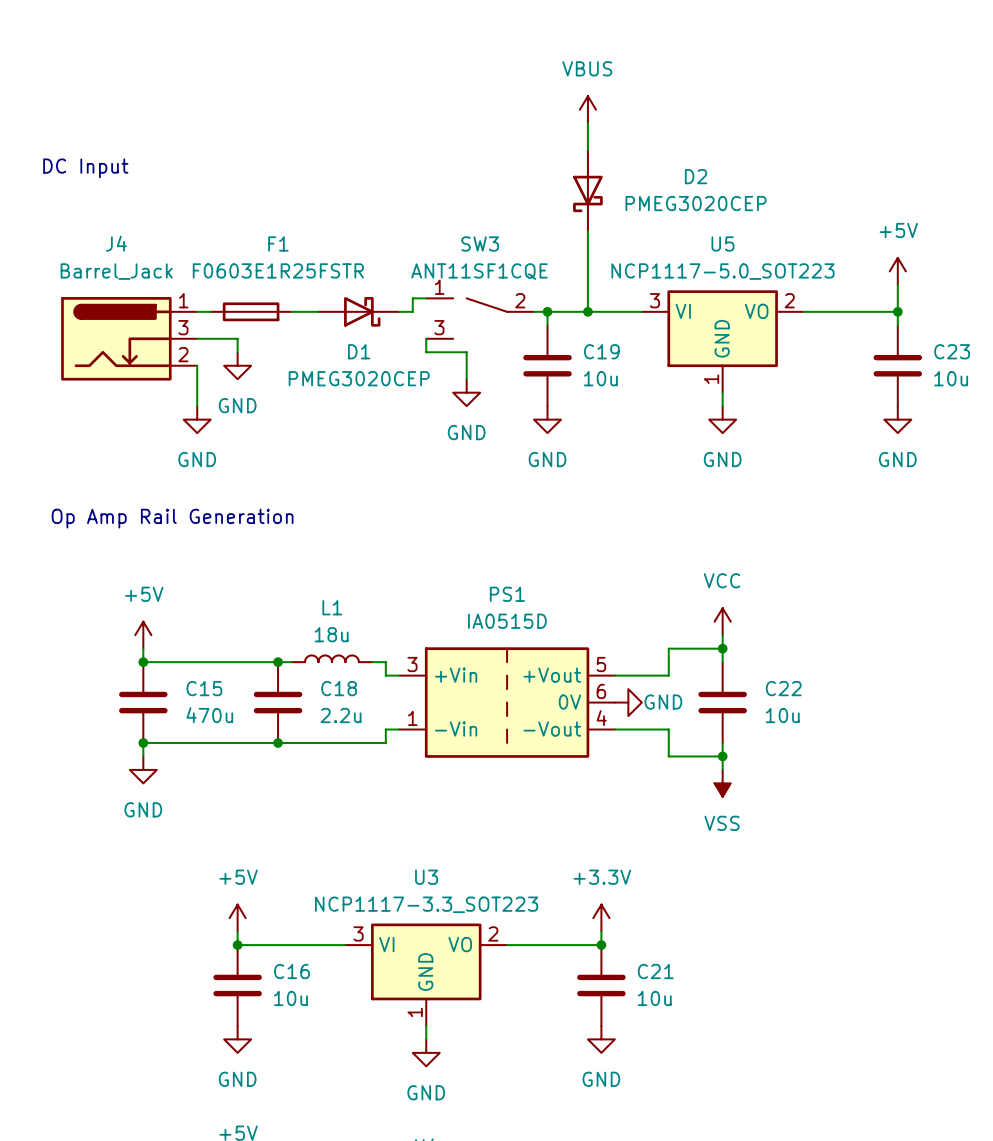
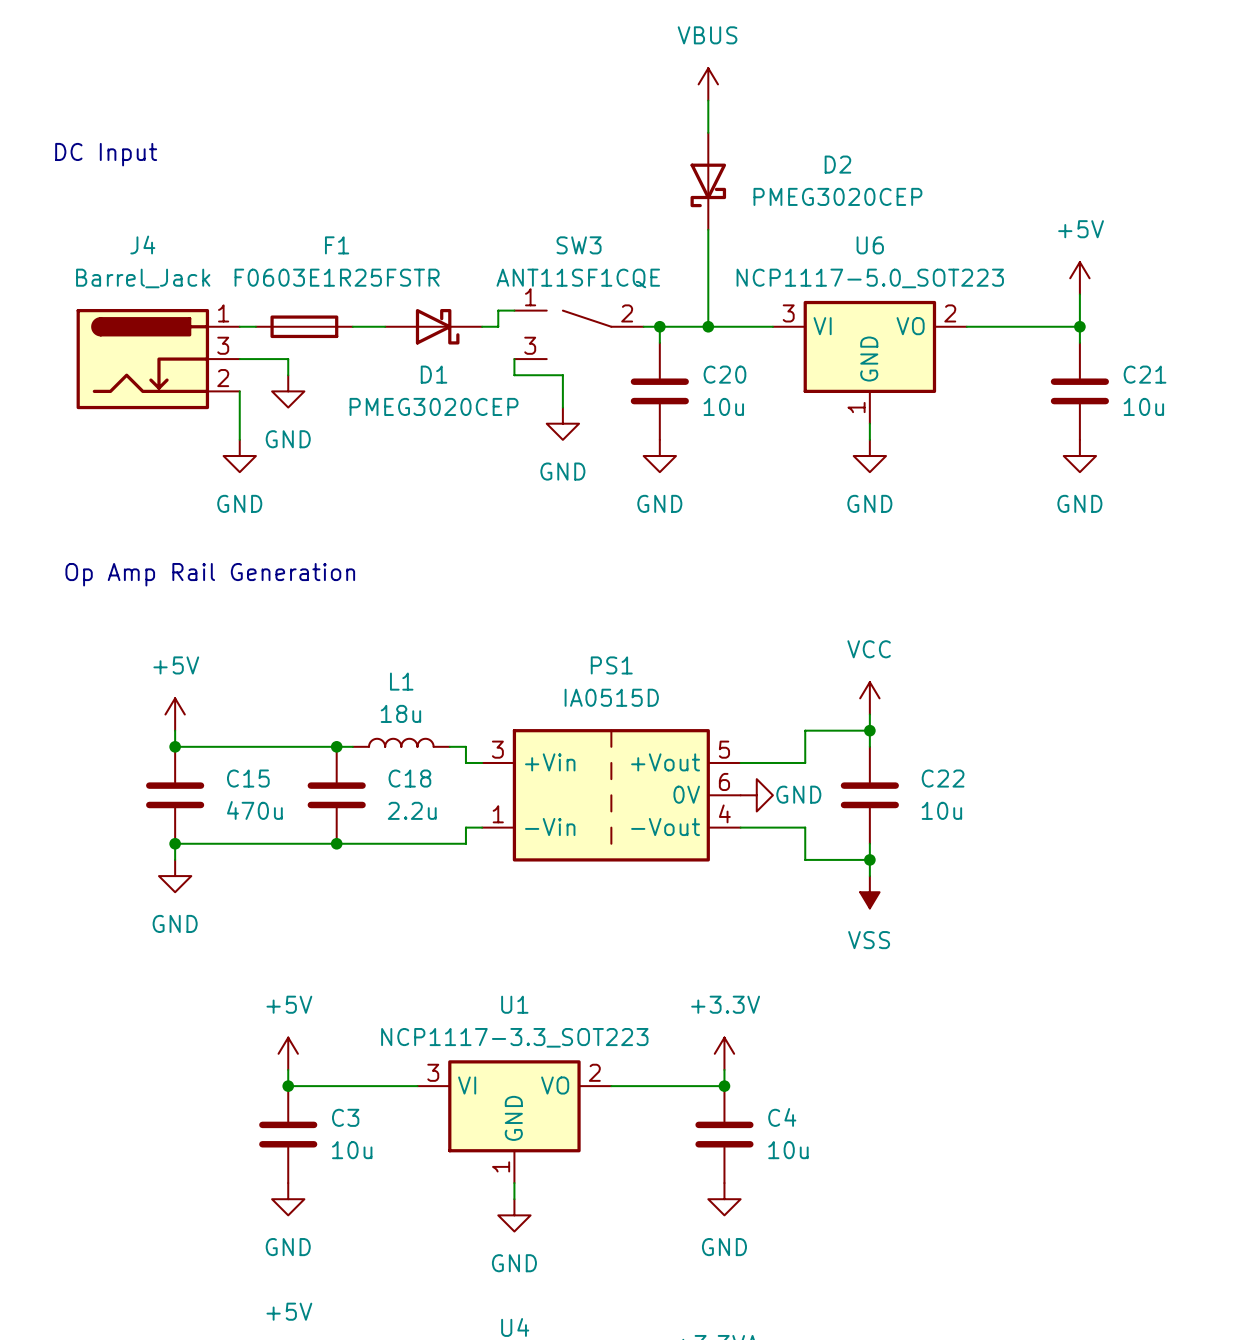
U5 name: U5 (722, 243) -> U6 (870, 245)
C19 name: C19 (601, 351) -> C20 (724, 374)
C23 name: C23 (952, 351) -> C21 (1145, 374)
U3 name: U3 (426, 877) -> U1 (514, 1004)
C16 name: C16 (291, 971) -> C3 (345, 1117)
C21 name: C21 (655, 971) -> C4 (782, 1117)

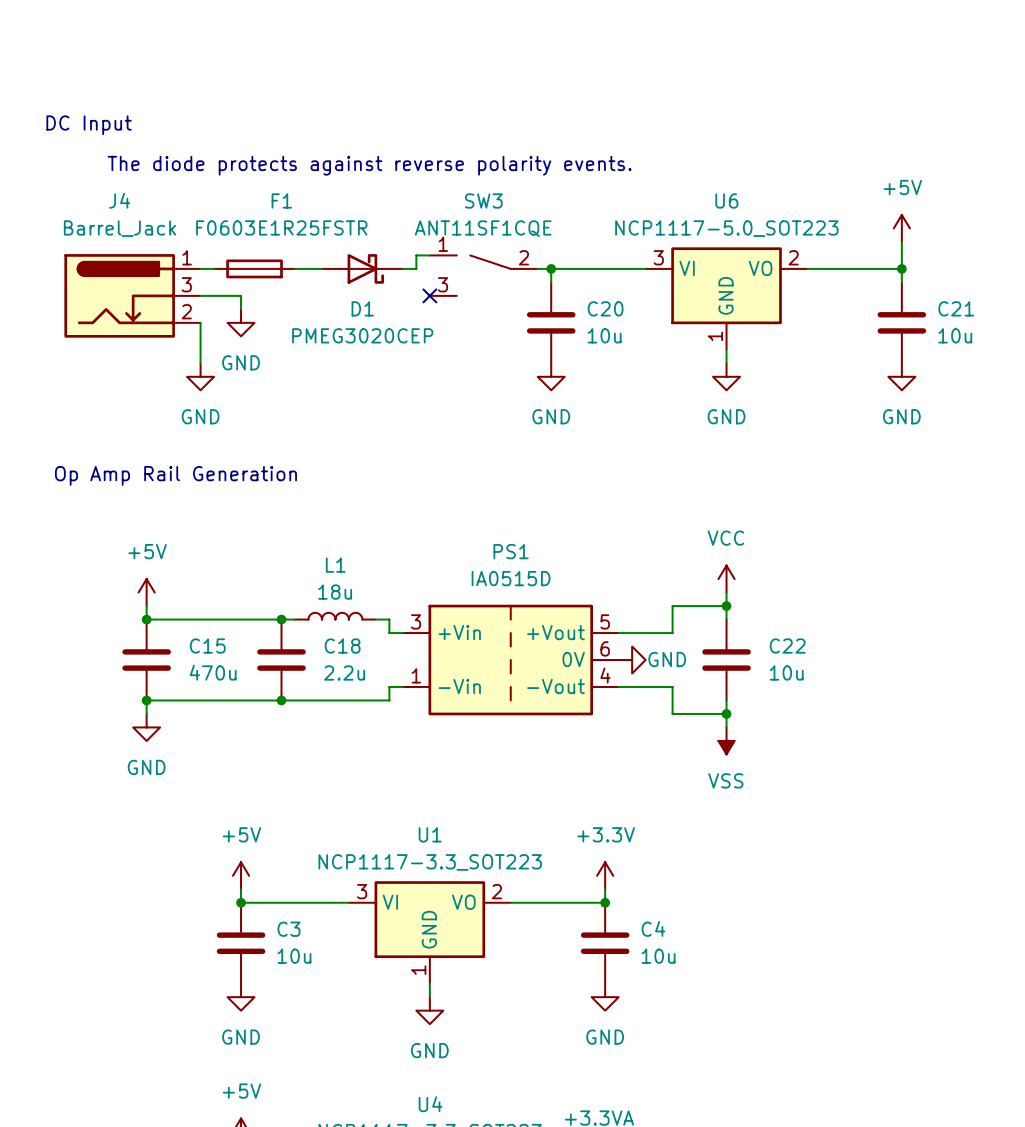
power symbol: VBUS (708, 84) -> none
wire: (708, 100) (708, 132) -> none
D2: PMEG3020CEP (708, 181) -> none
text: none -> The diode protects against reverse polarity events. (369, 165)
wire: (708, 229) (708, 326) -> none
junction: (708, 326) -> none
wire: (514, 359) (514, 375) (562, 375) (562, 407) -> none
no-connect mark: none -> (429, 295)
power symbol: GND (562, 423) -> none

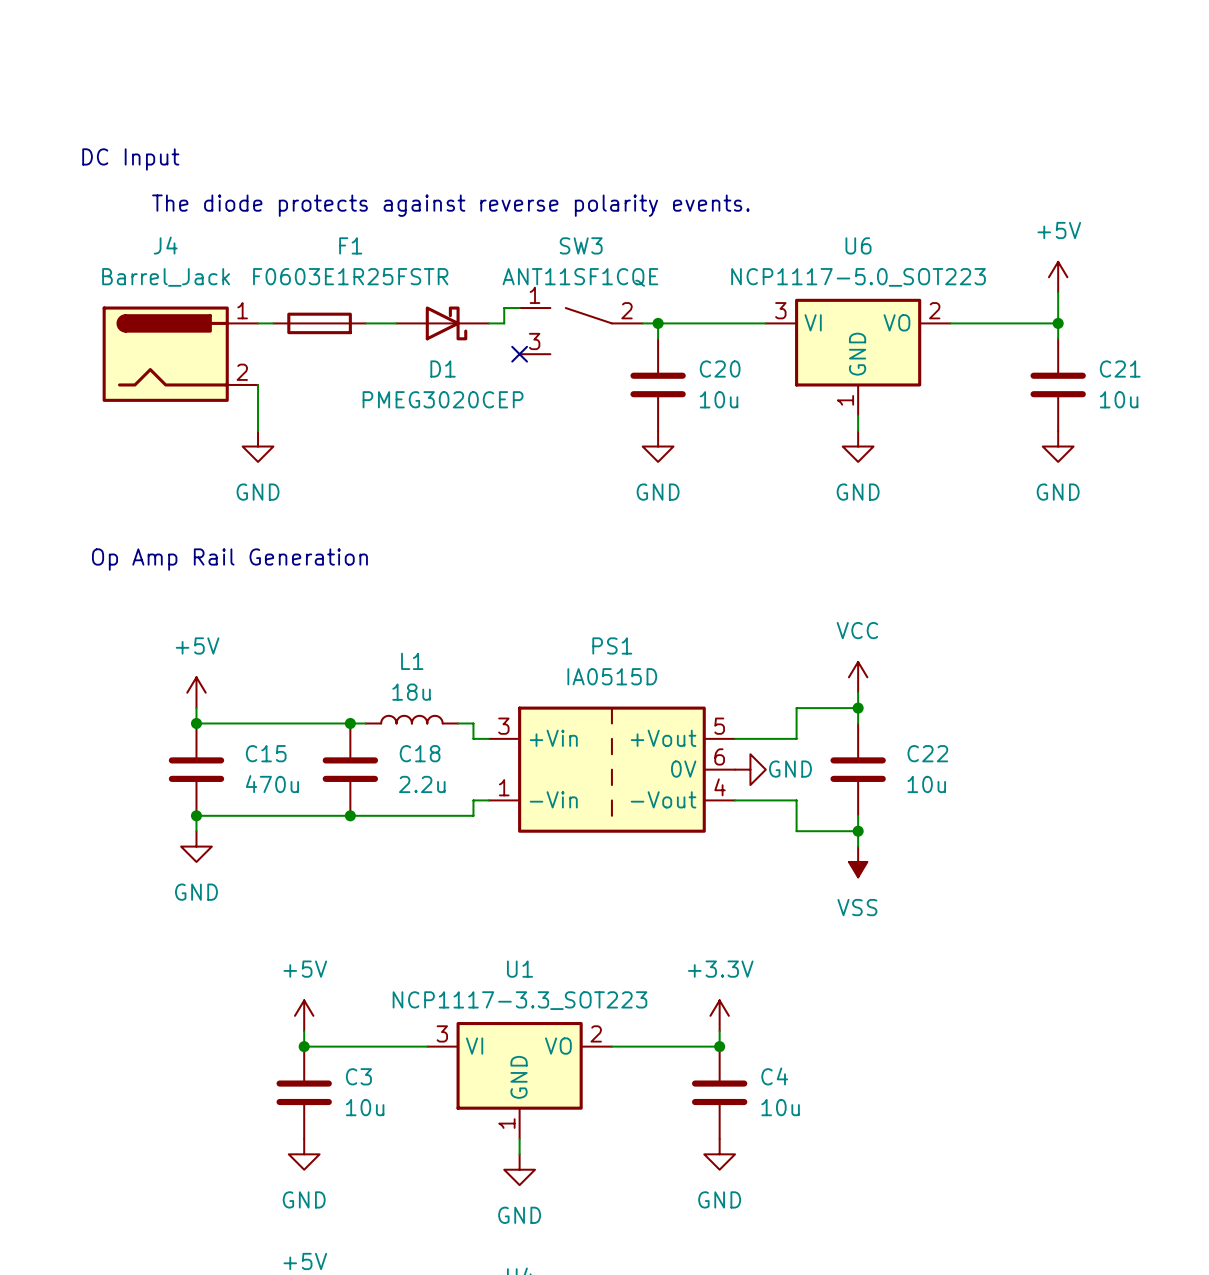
J4 symbol: [64, 254, 201, 338] -> [102, 306, 259, 402]
wire: (200, 295) (241, 295) (241, 309) -> none
power symbol: GND (241, 322) -> none

